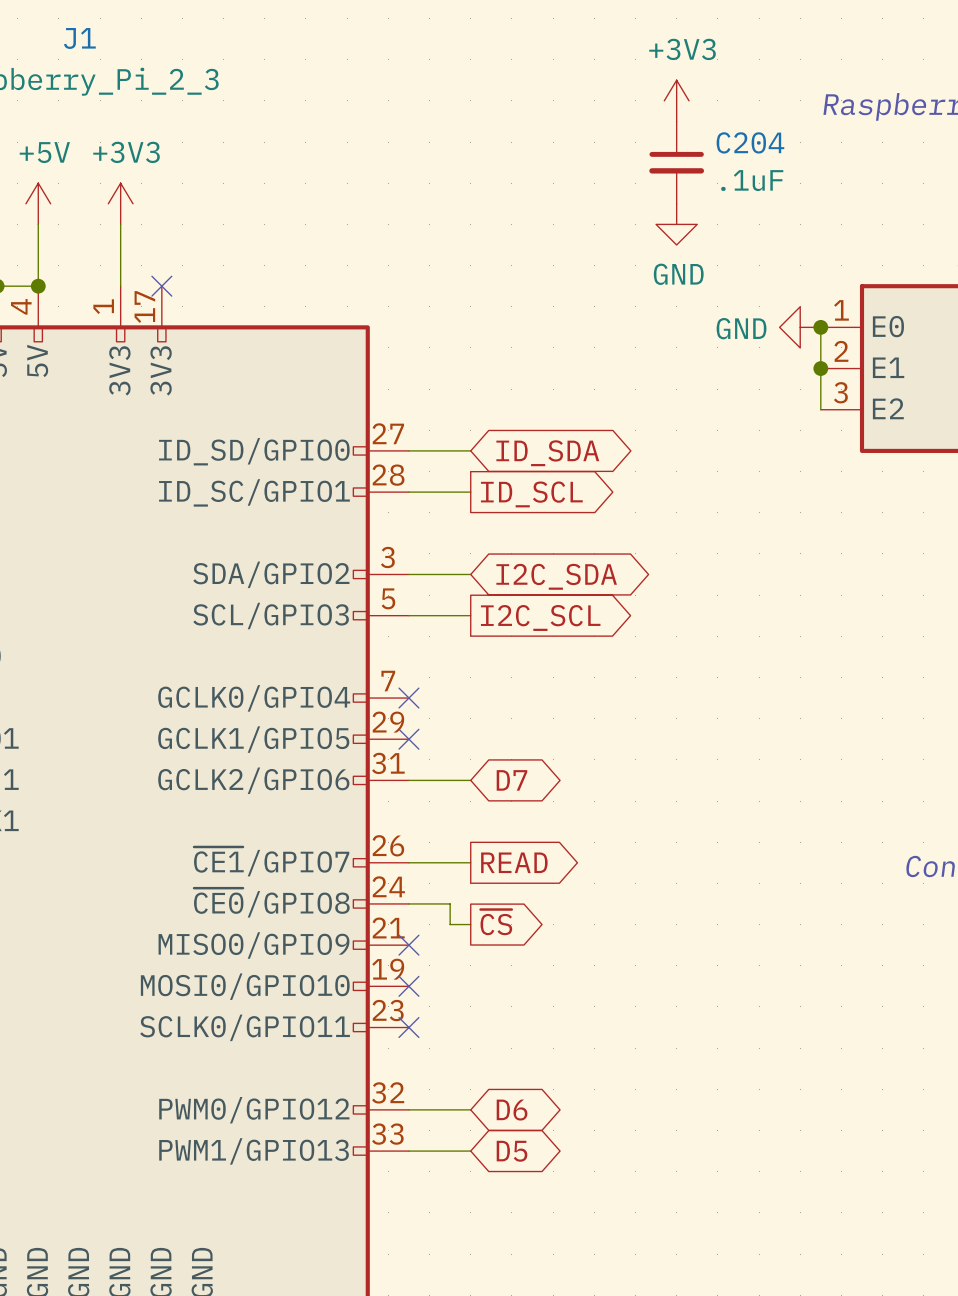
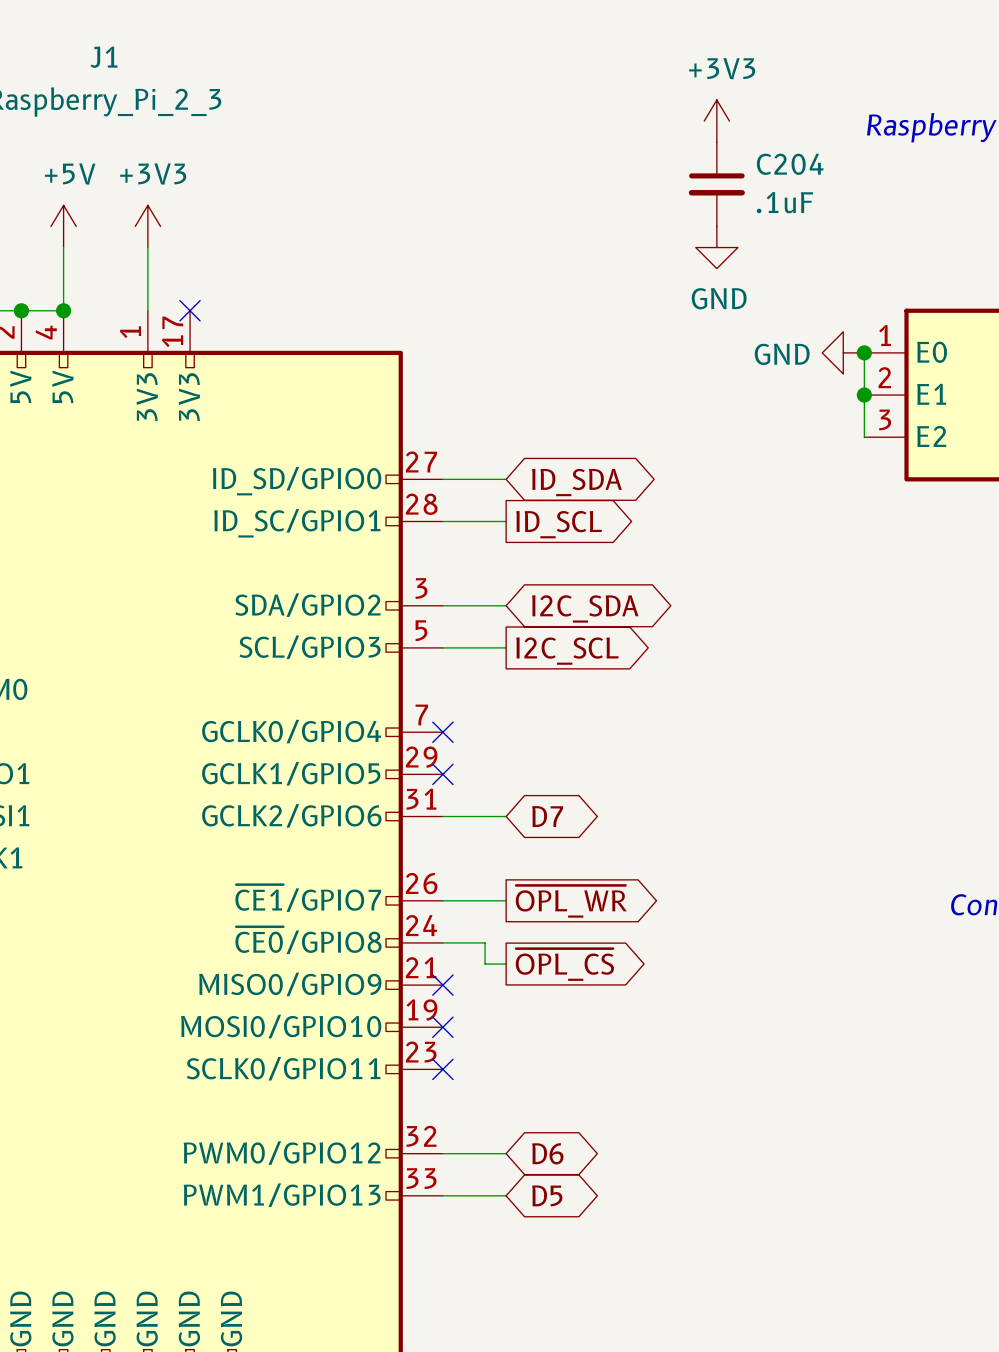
global label: READ (514, 862) -> ~{OPL_WR} (571, 901)
global label: ~{CS} (496, 922) -> ~{OPL_CS} (564, 964)

